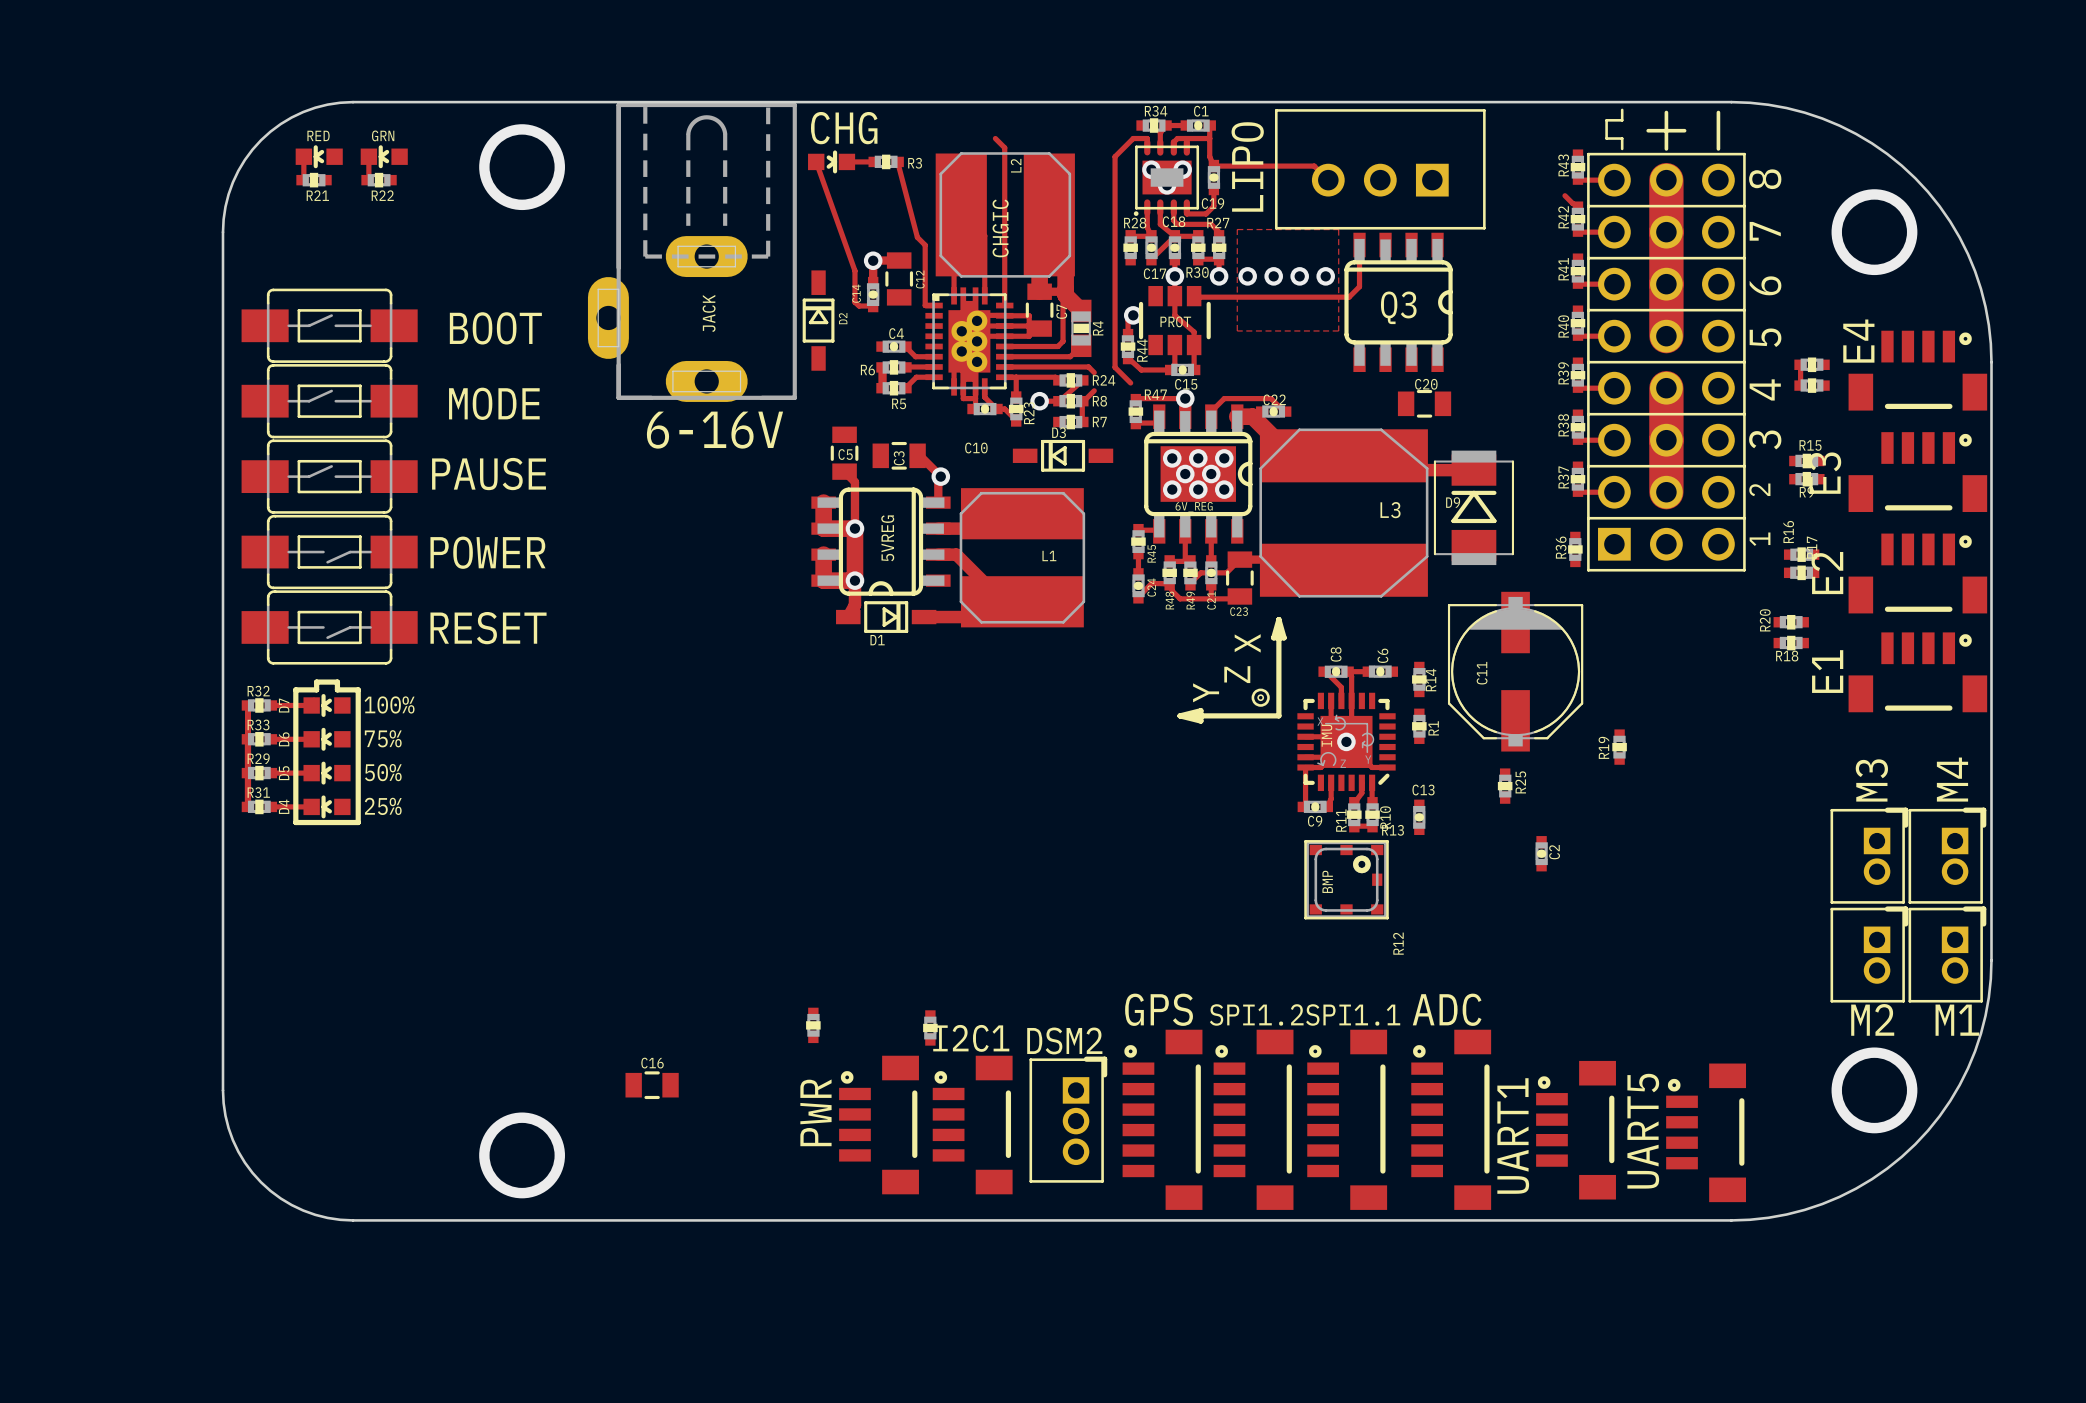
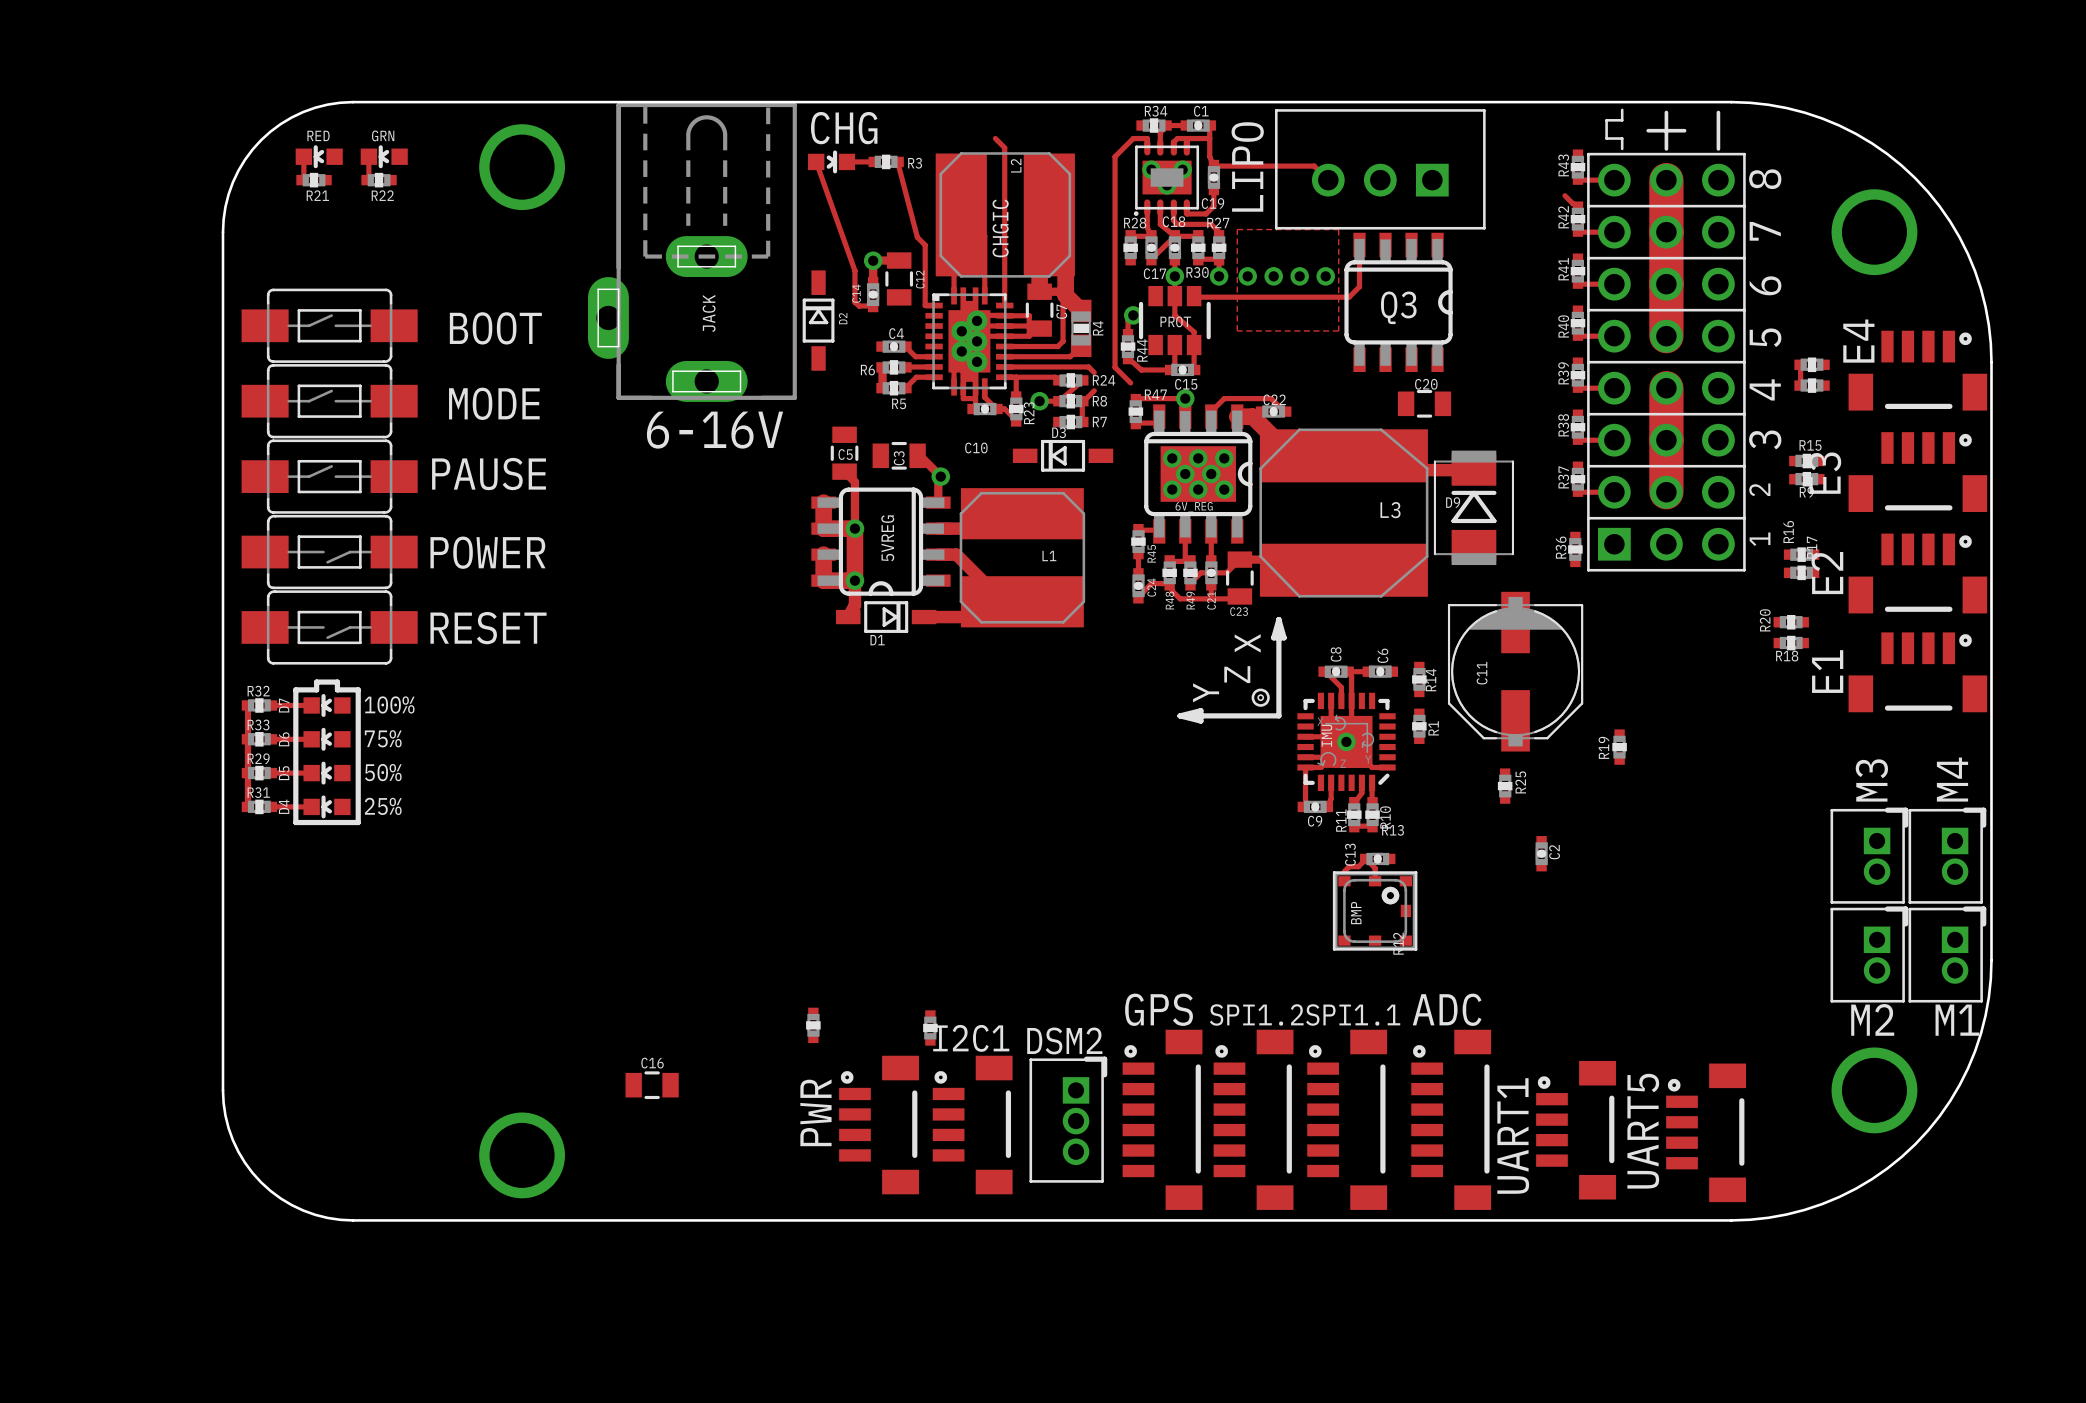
C13 rotation: 0° (1419, 817) -> 90° clockwise (1377, 858)
C13 position: (1419, 817) -> (1377, 858)
track: none -> (1344, 871) (1349, 866) (1358, 866) (1366, 858) (1375, 868) (1375, 881)
BMP position: (1346, 879) -> (1375, 910)

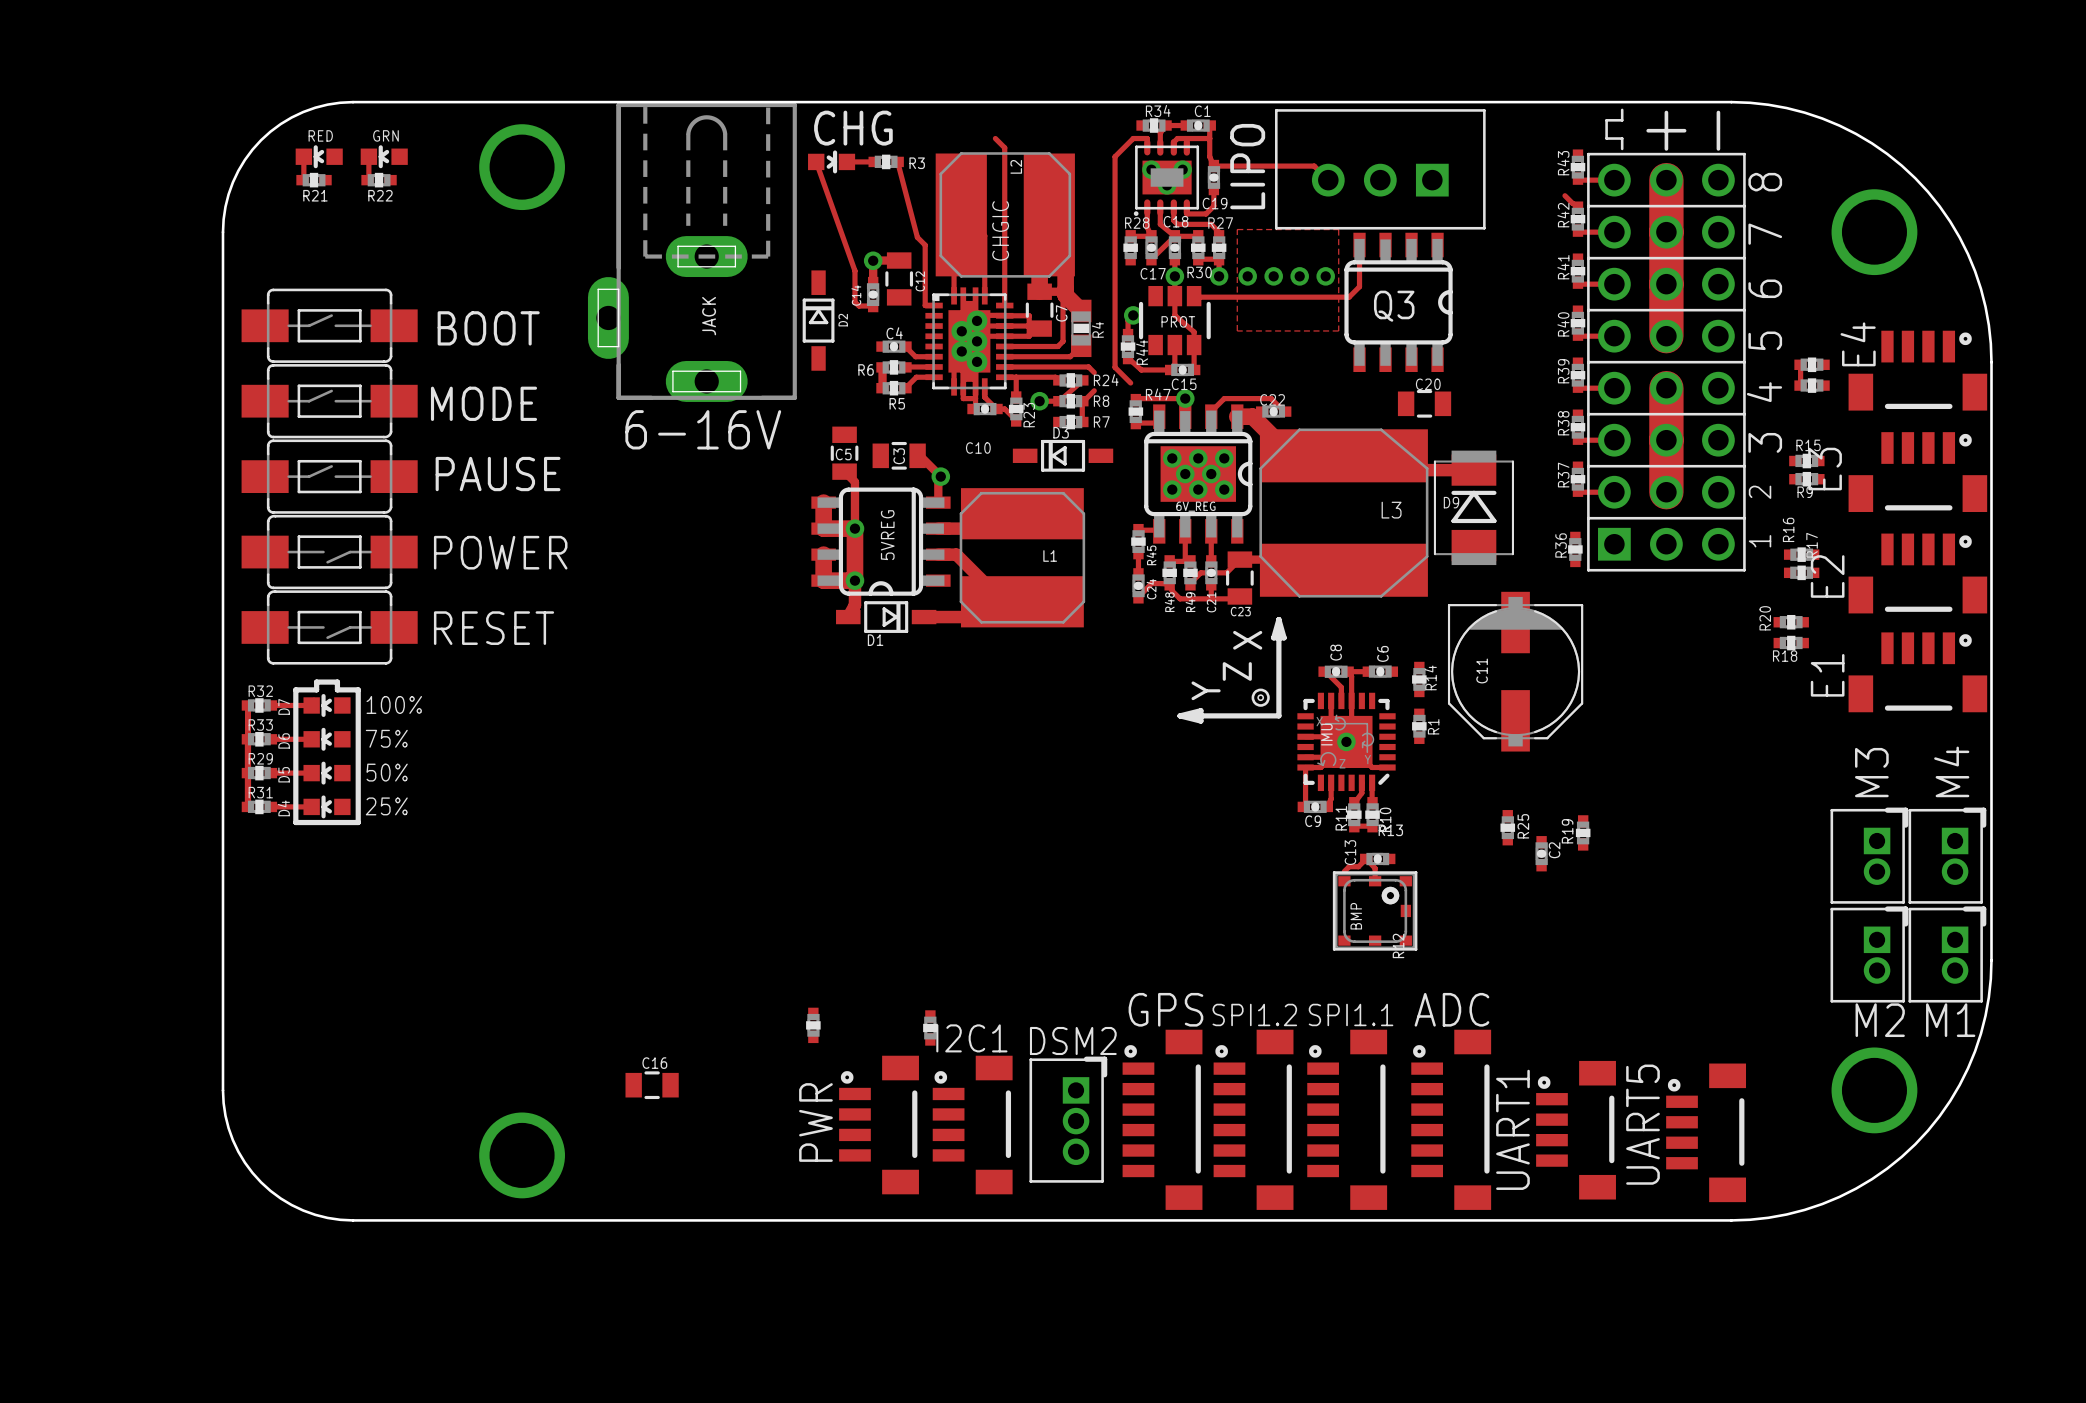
R19 position: (1619, 747) -> (1583, 832)
R25 position: (1505, 786) -> (1507, 827)

